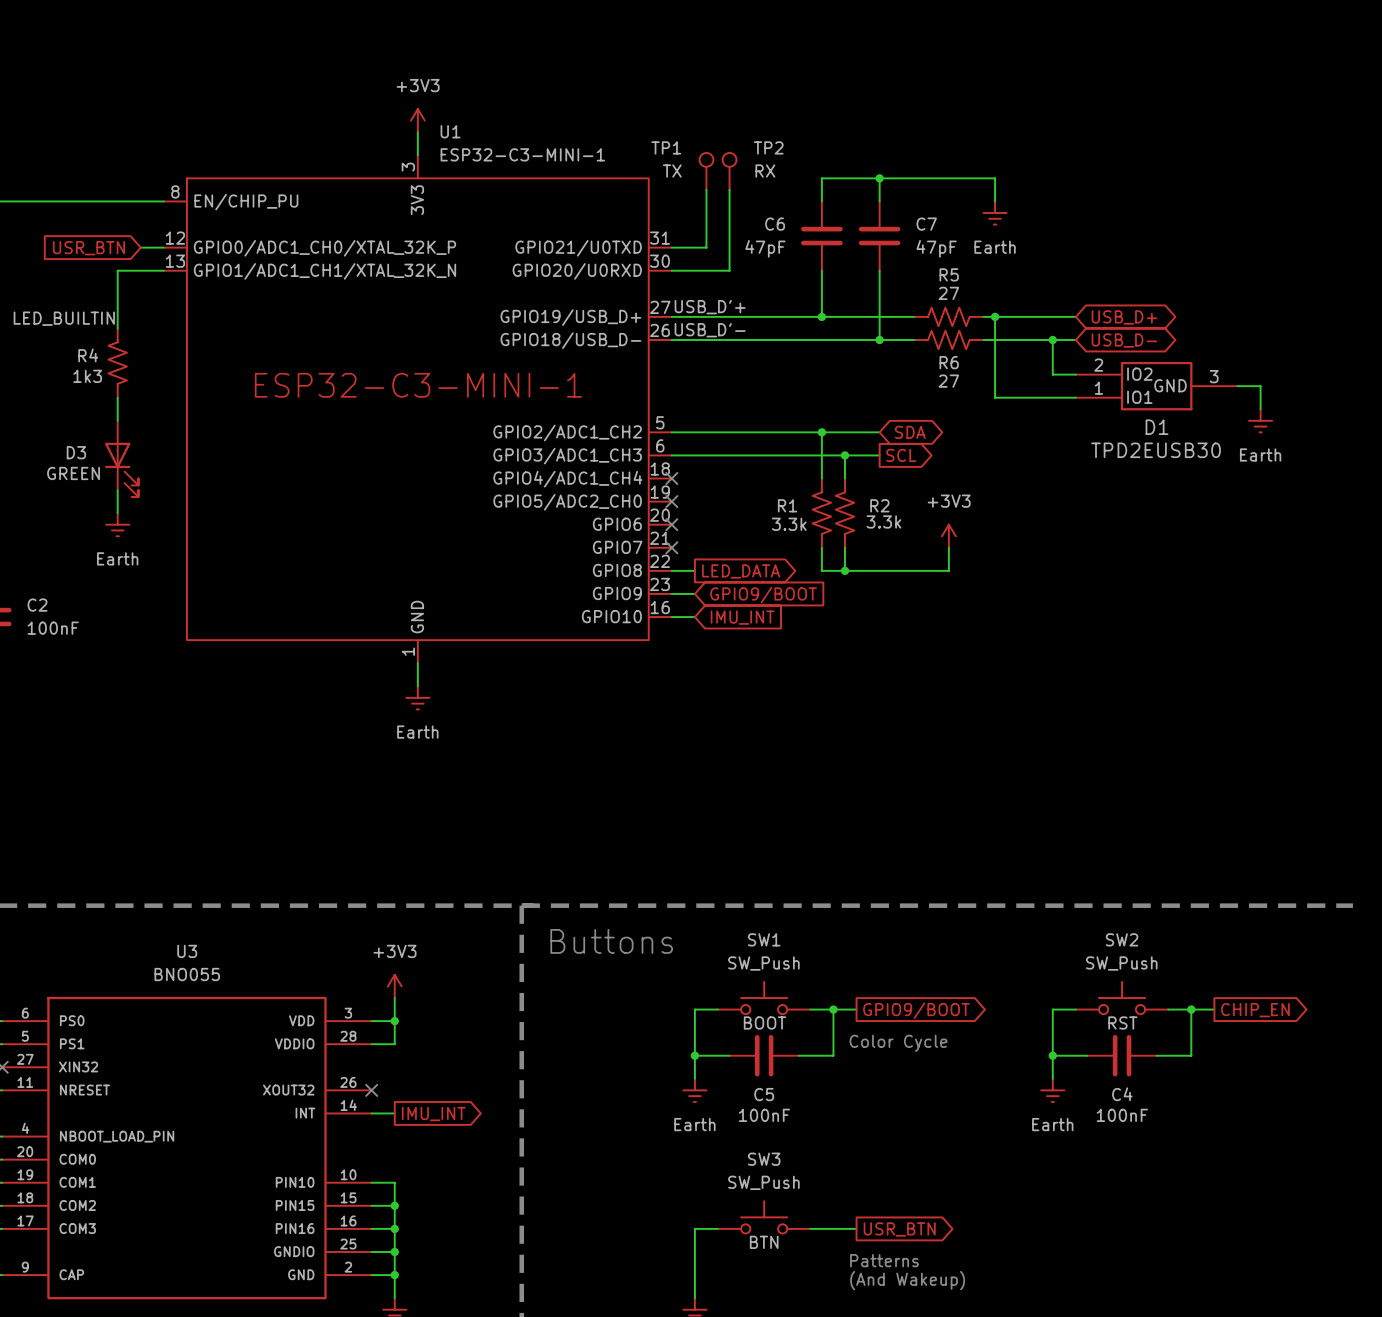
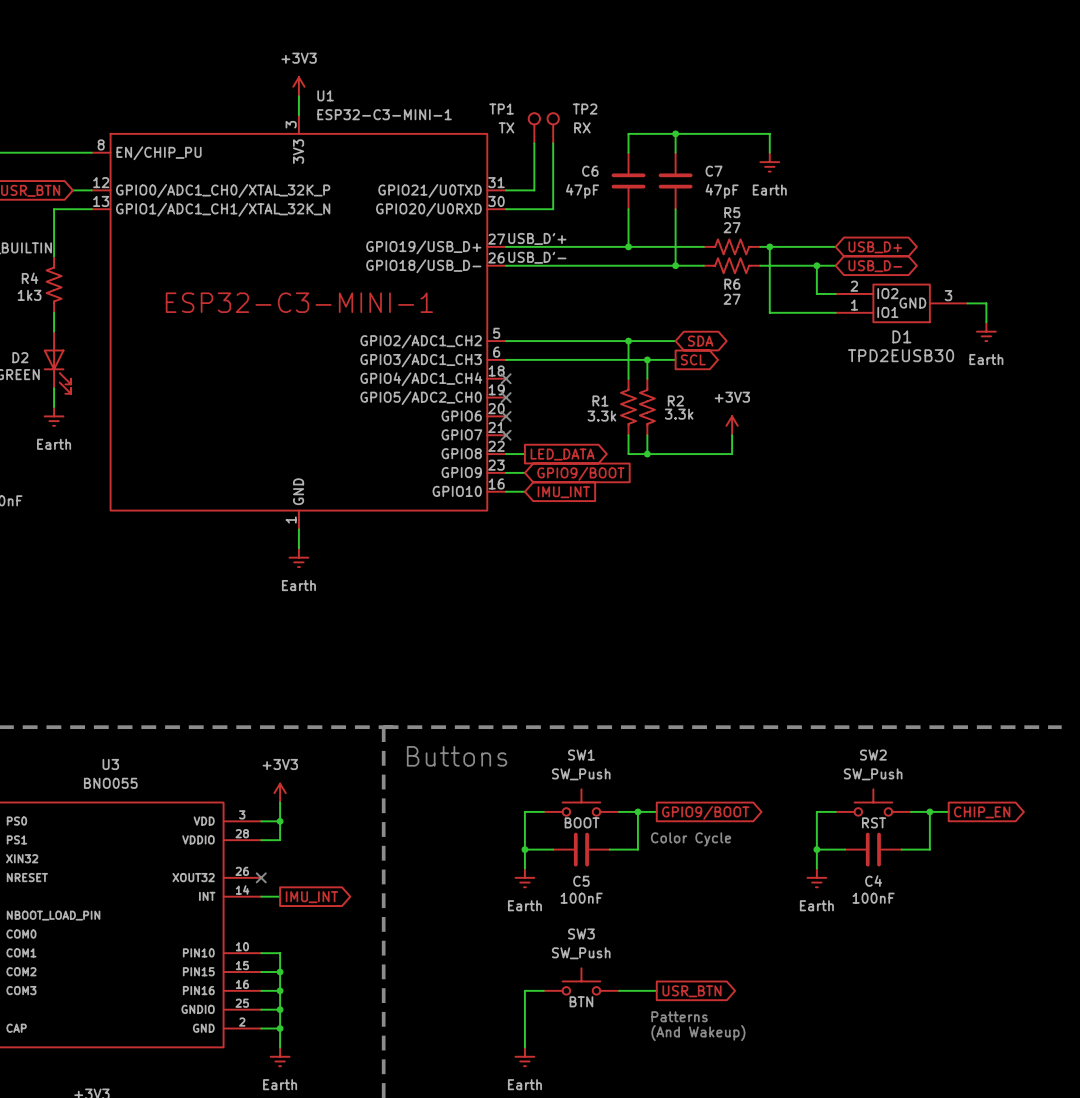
D3 name: D3 (76, 452) -> D2 (20, 357)

